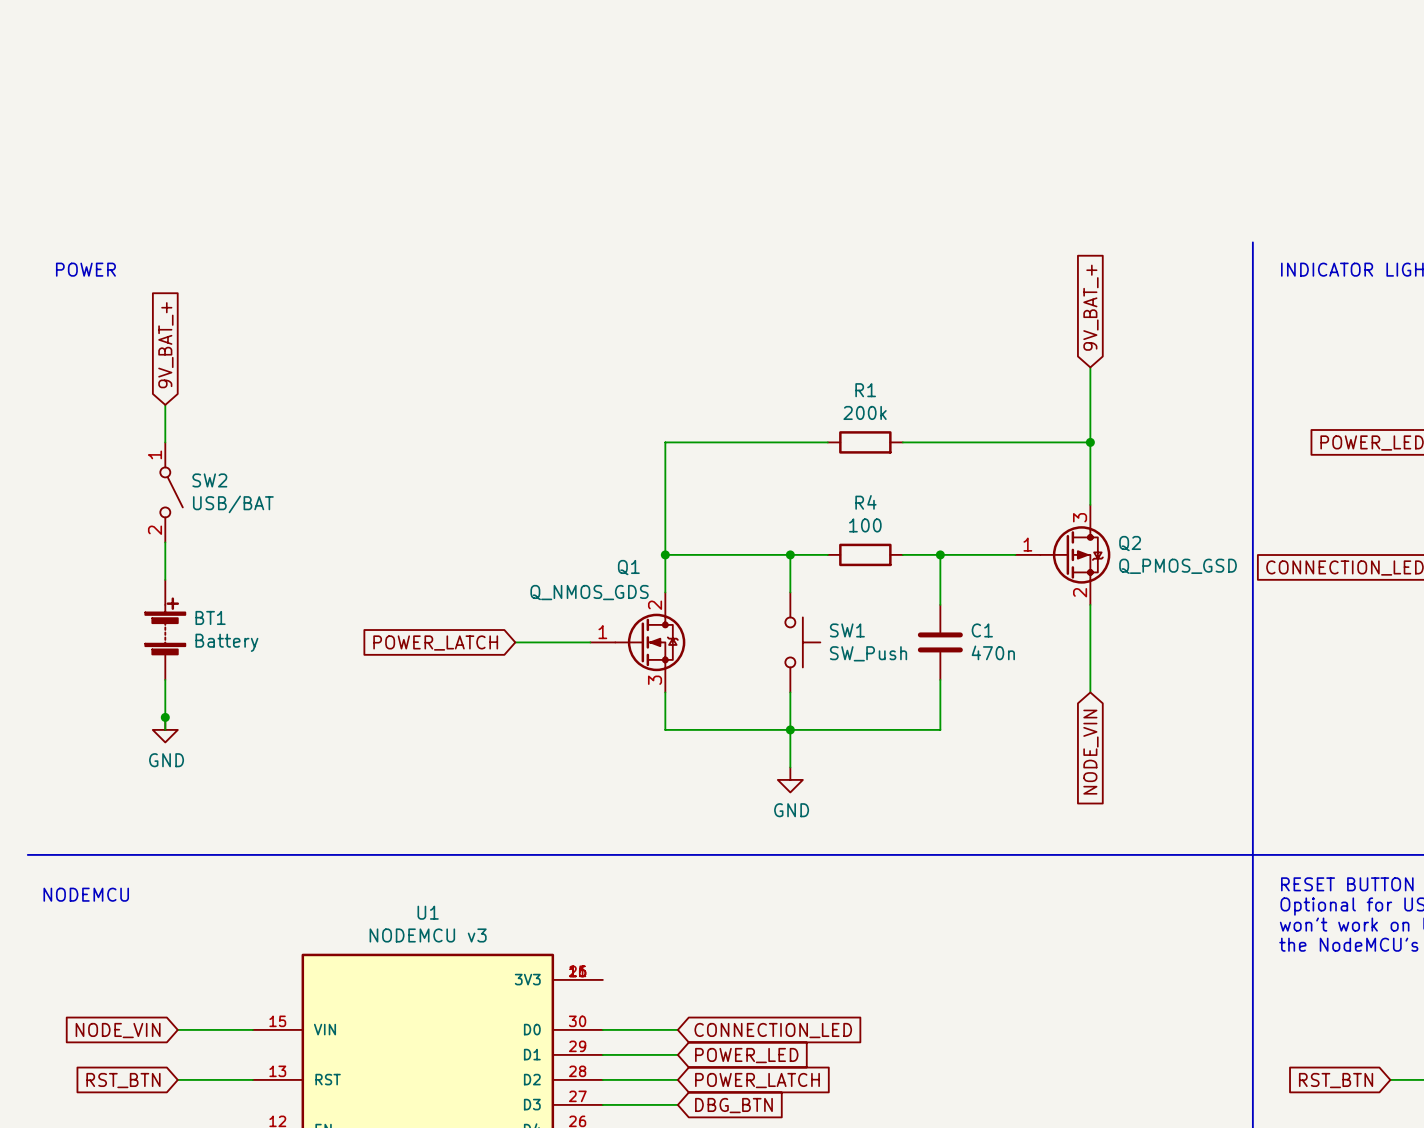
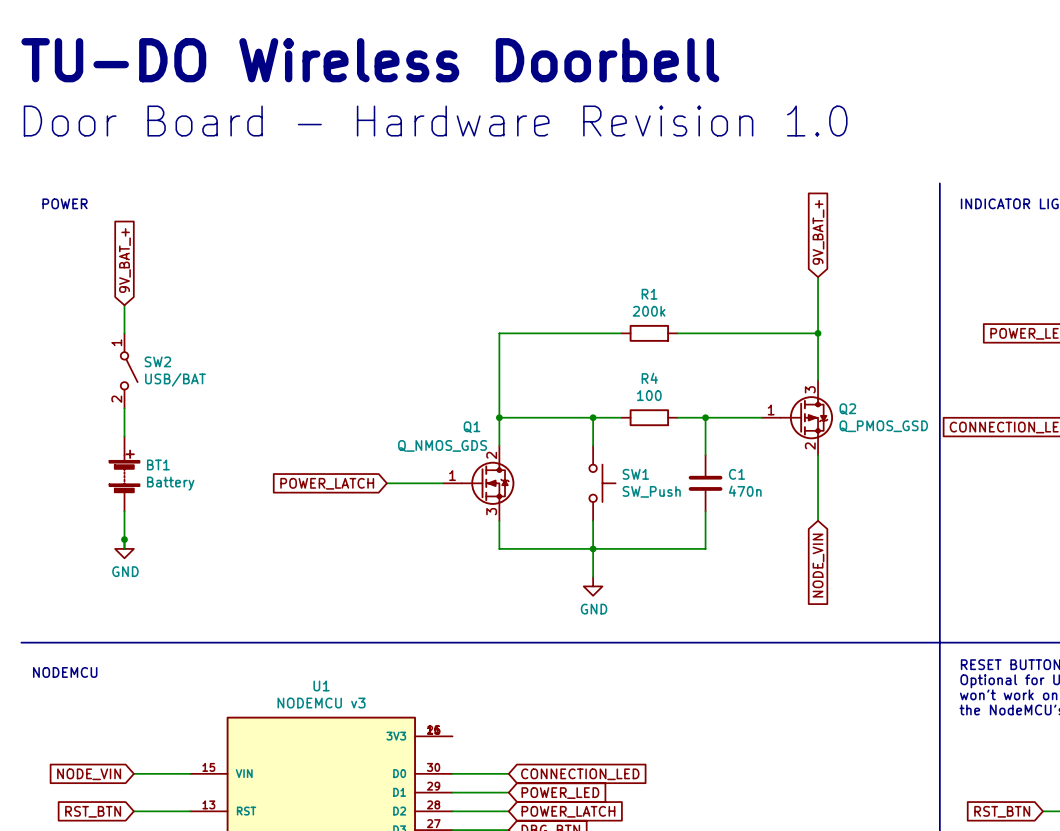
text: none -> TU-DO Wireless Doorbell (370, 60)
text: none -> Door Board - Hardware Revision 1.0 (435, 121)

